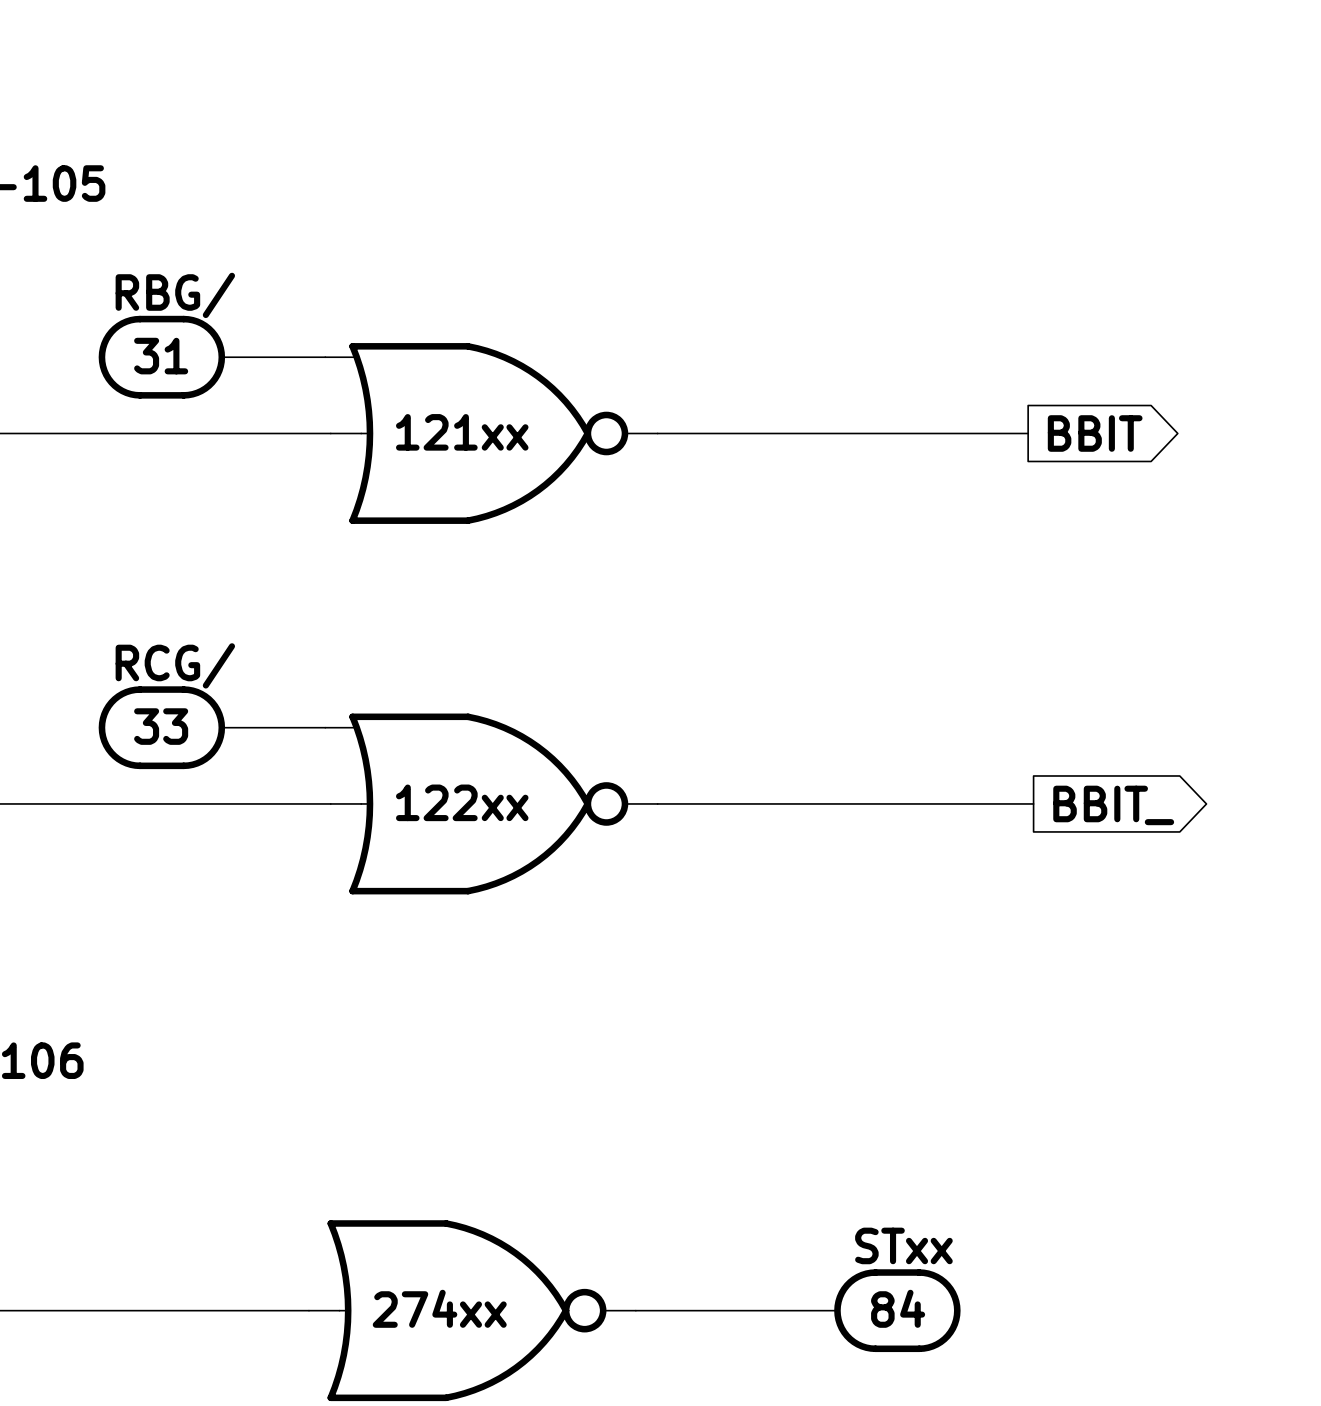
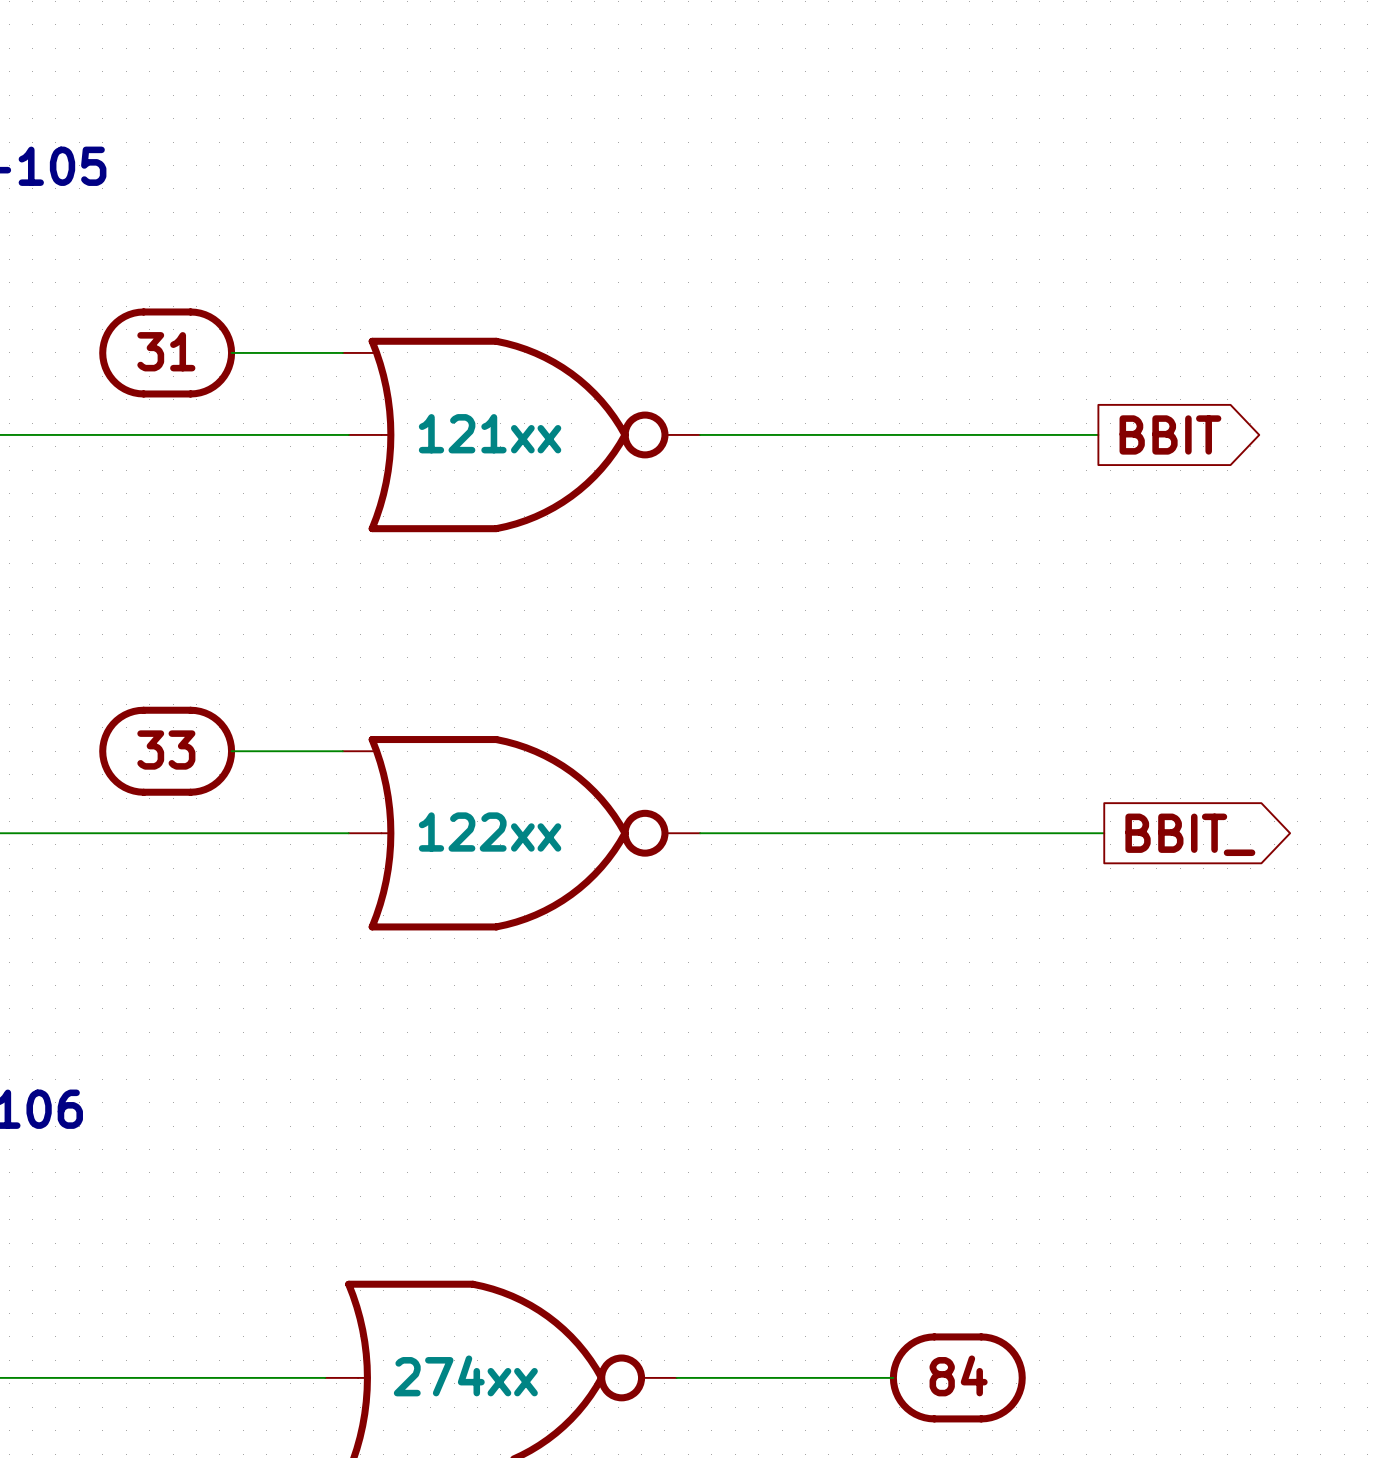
text: RBG/ (175, 295) -> none
text: RCG/ (175, 665) -> none
text: STxx (903, 1245) -> none

